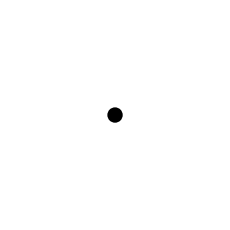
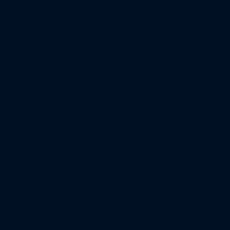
drawing: [107, 107, 123, 123] -> none

